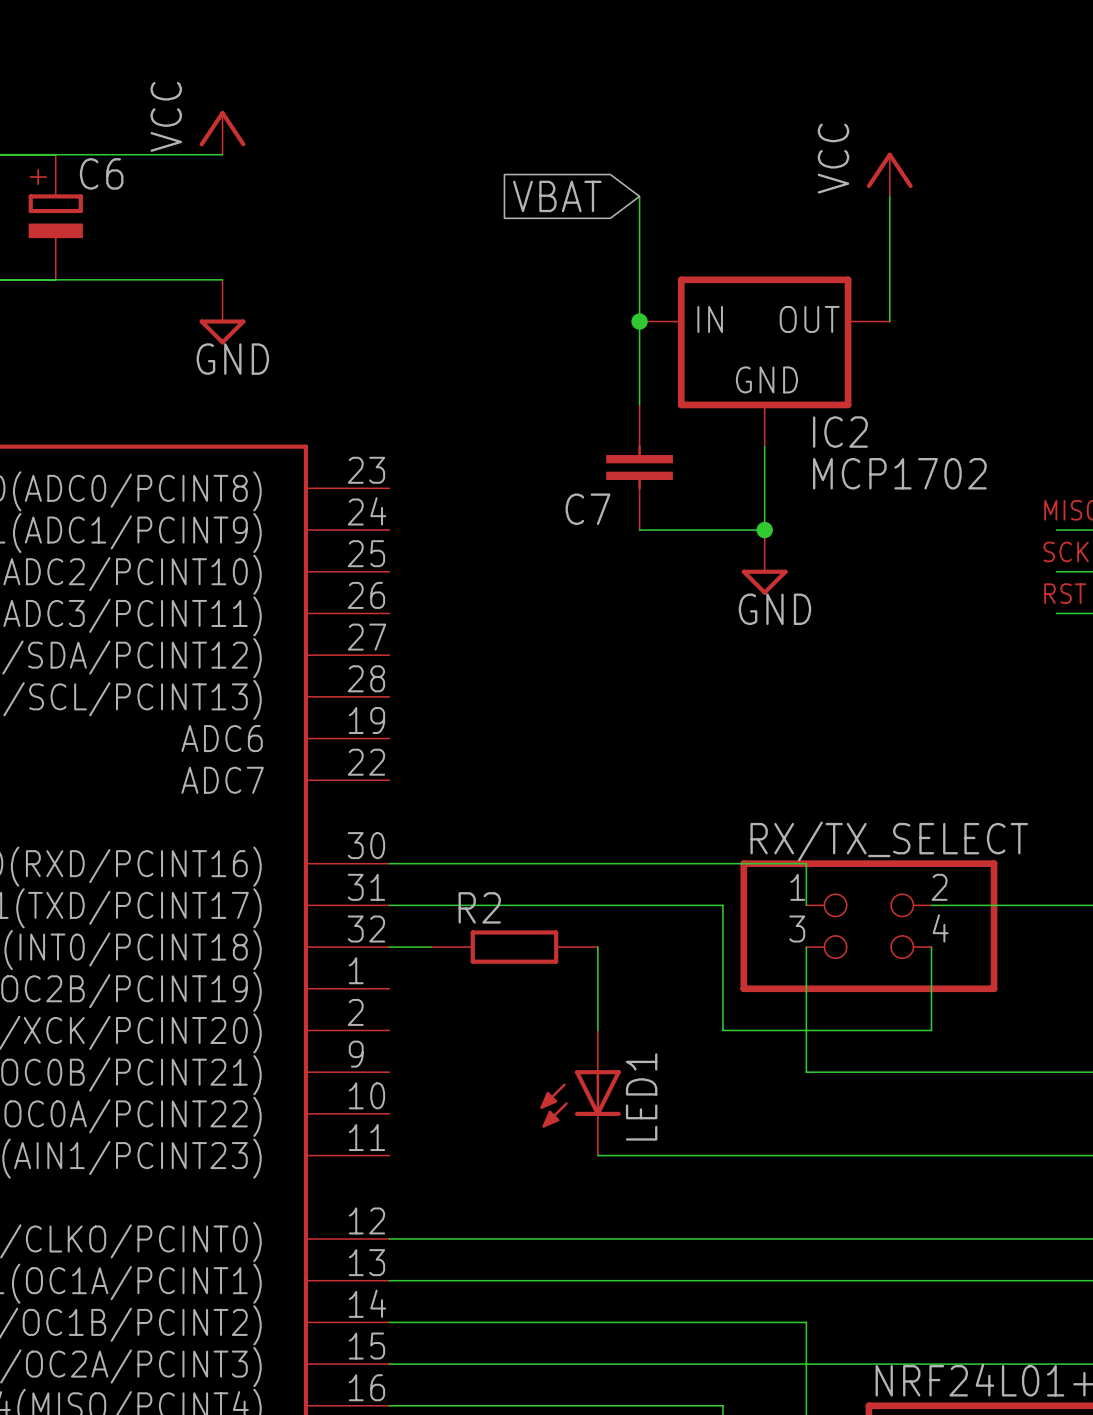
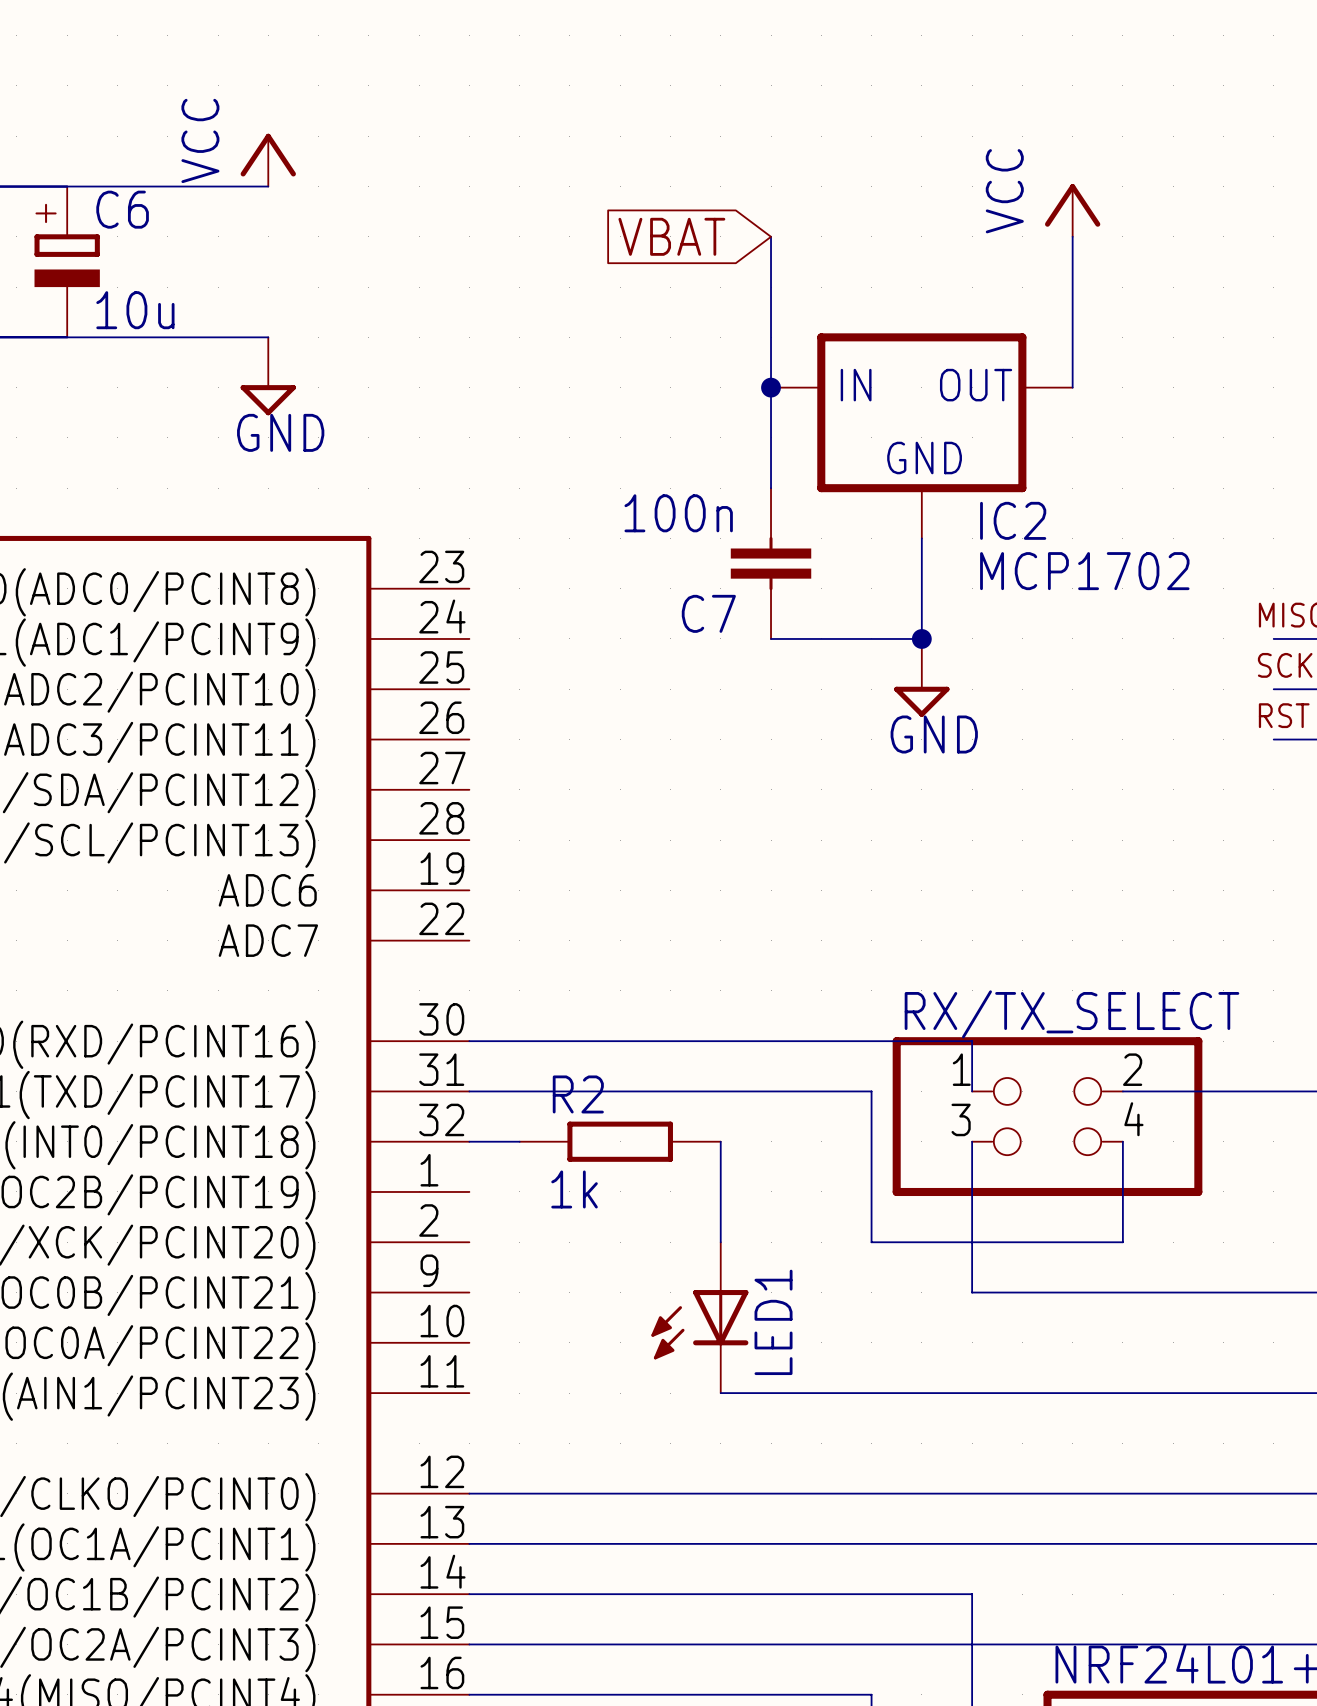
C6 value: none -> 10u (135, 310)
C7 value: none -> 100n (678, 513)
R2 value: none -> 1k (574, 1189)

